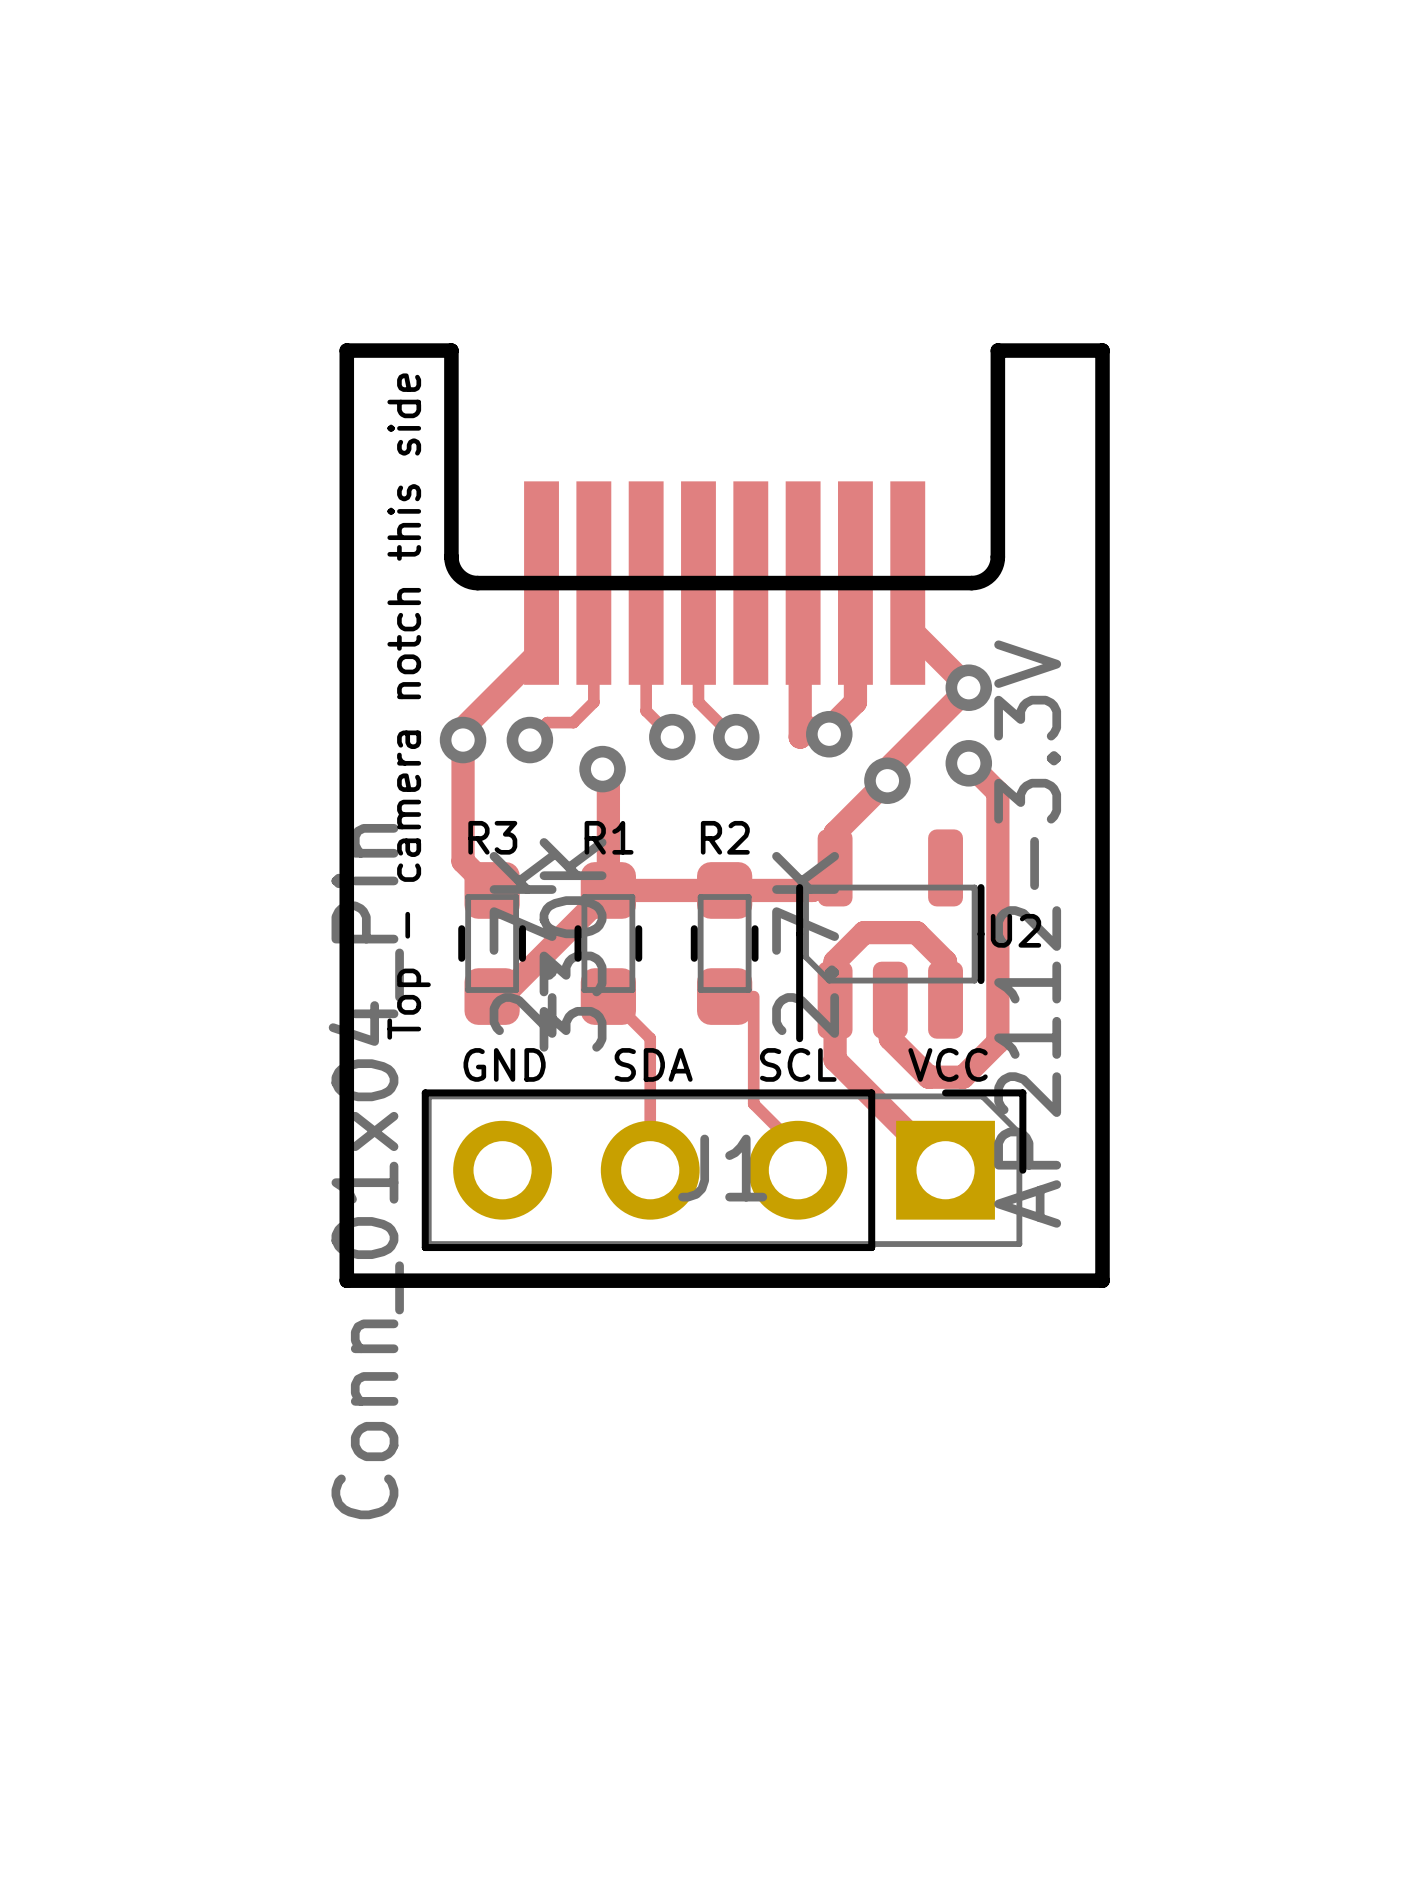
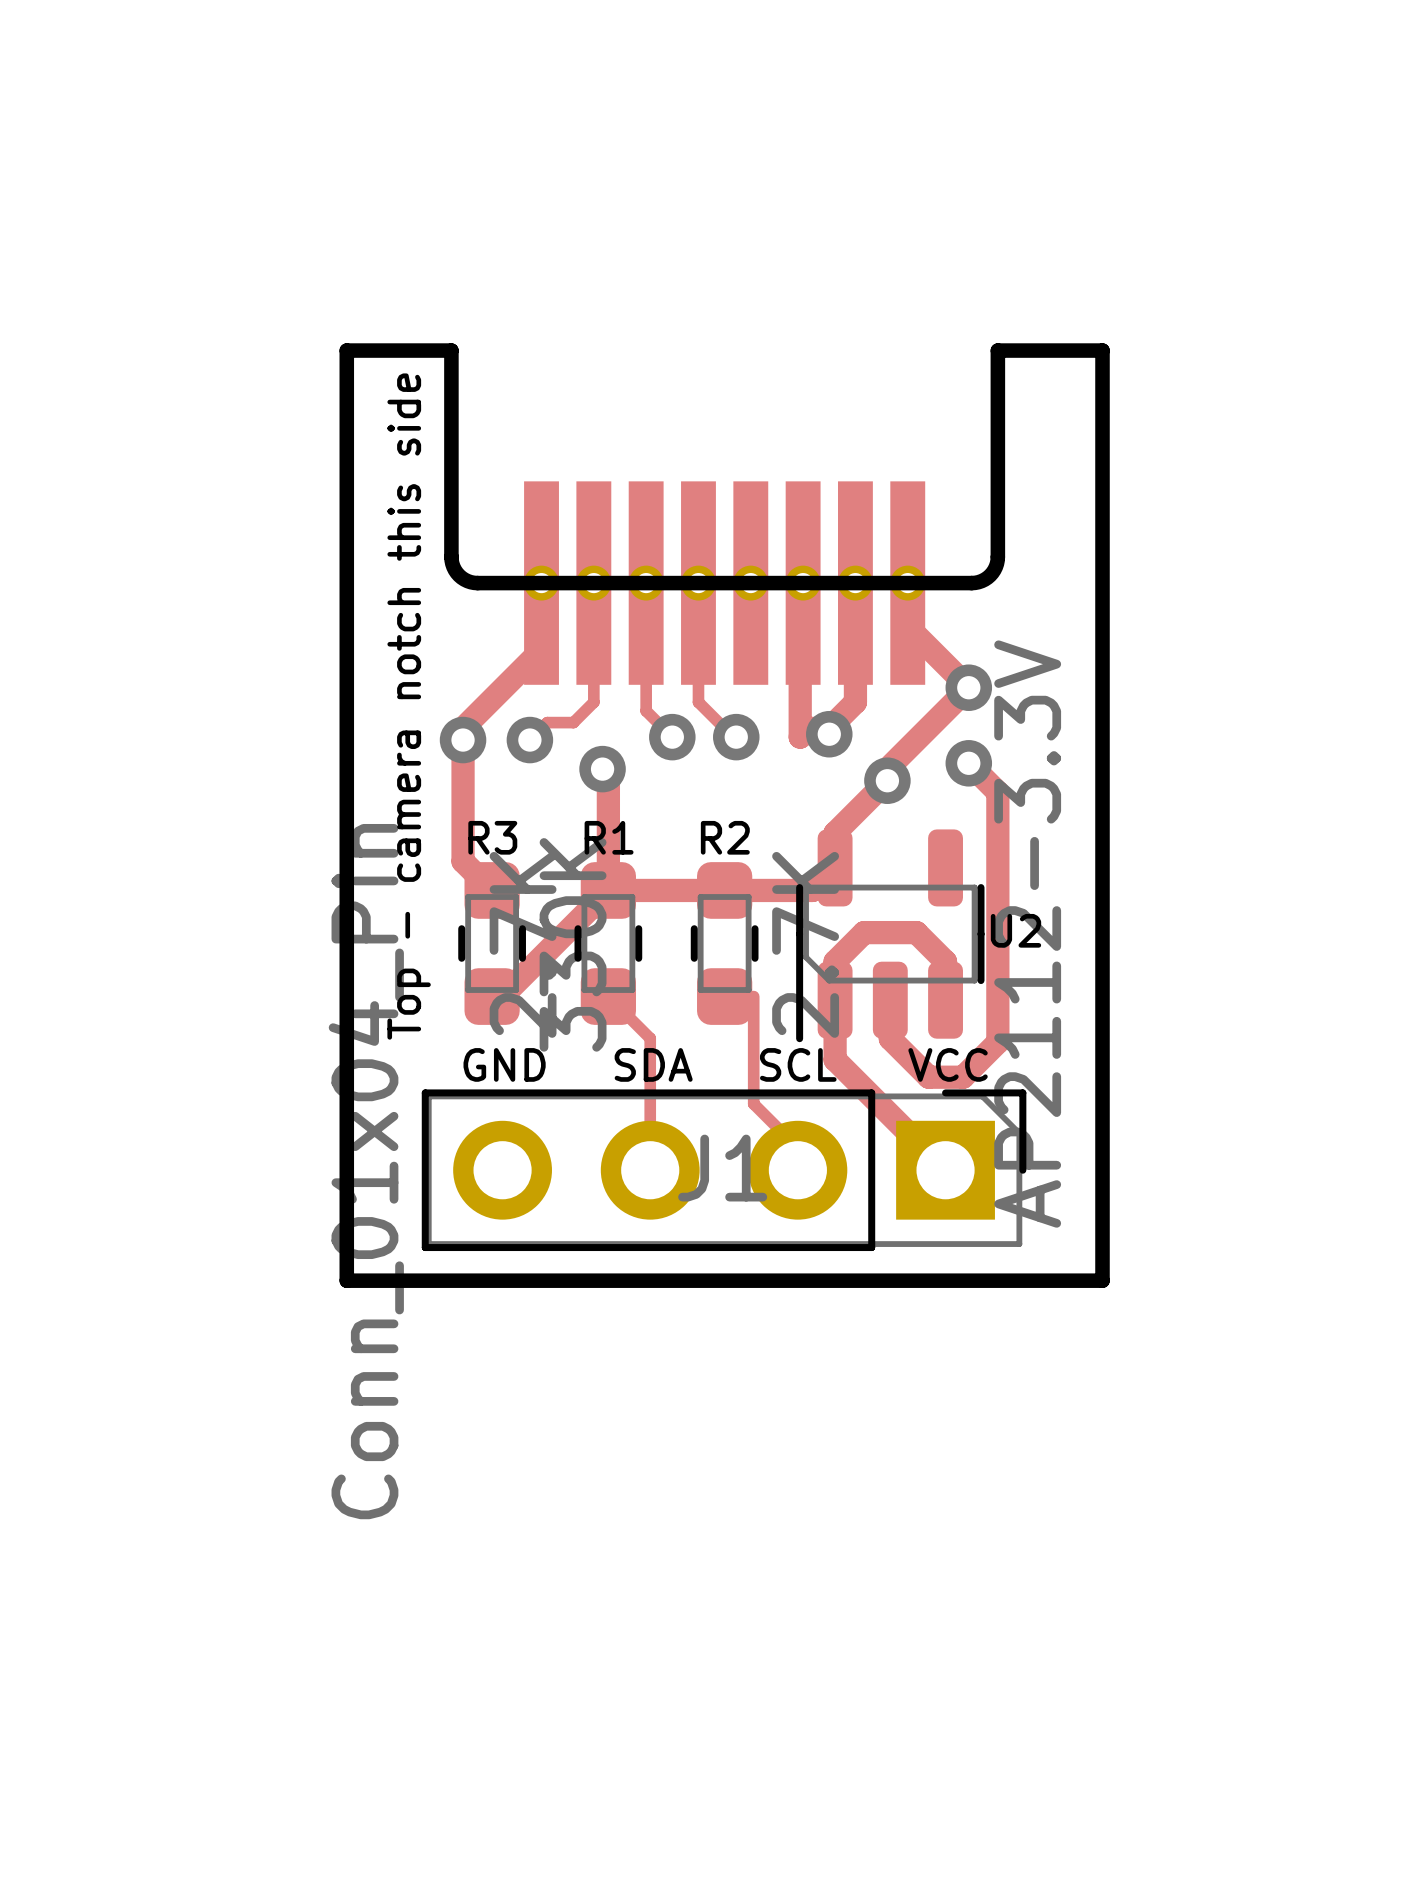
part footprint: [444, 343, 1006, 685] -> [444, 343, 1006, 685]

